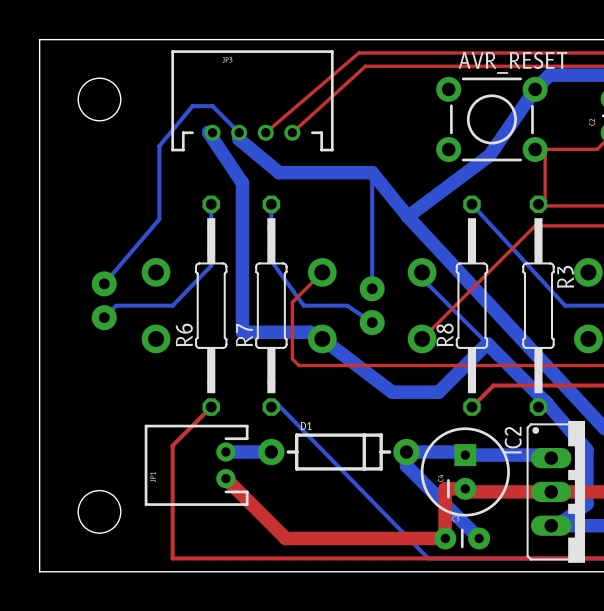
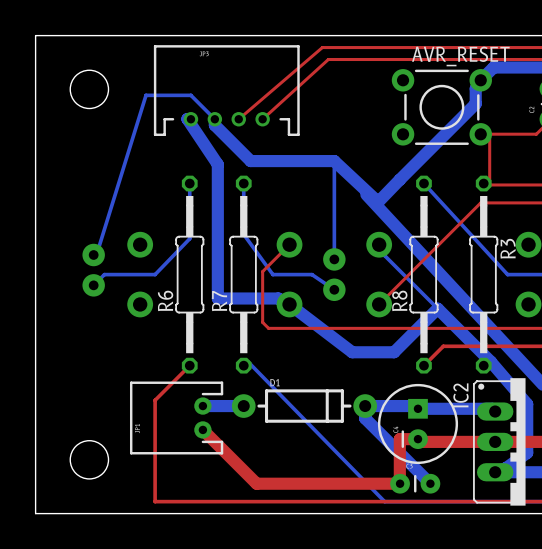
bottom track: (535, 89) (489, 155) (407, 216) (372, 172) -> (480, 80) (475, 88) (475, 103) (378, 202) (334, 161) (250, 161) (214, 125)
bottom track: (192, 106) (159, 146) (159, 219) (104, 283) -> (173, 95) (146, 95) (96, 255) (93, 255)
bottom track: (239, 139) (279, 172) (372, 172) -> none

